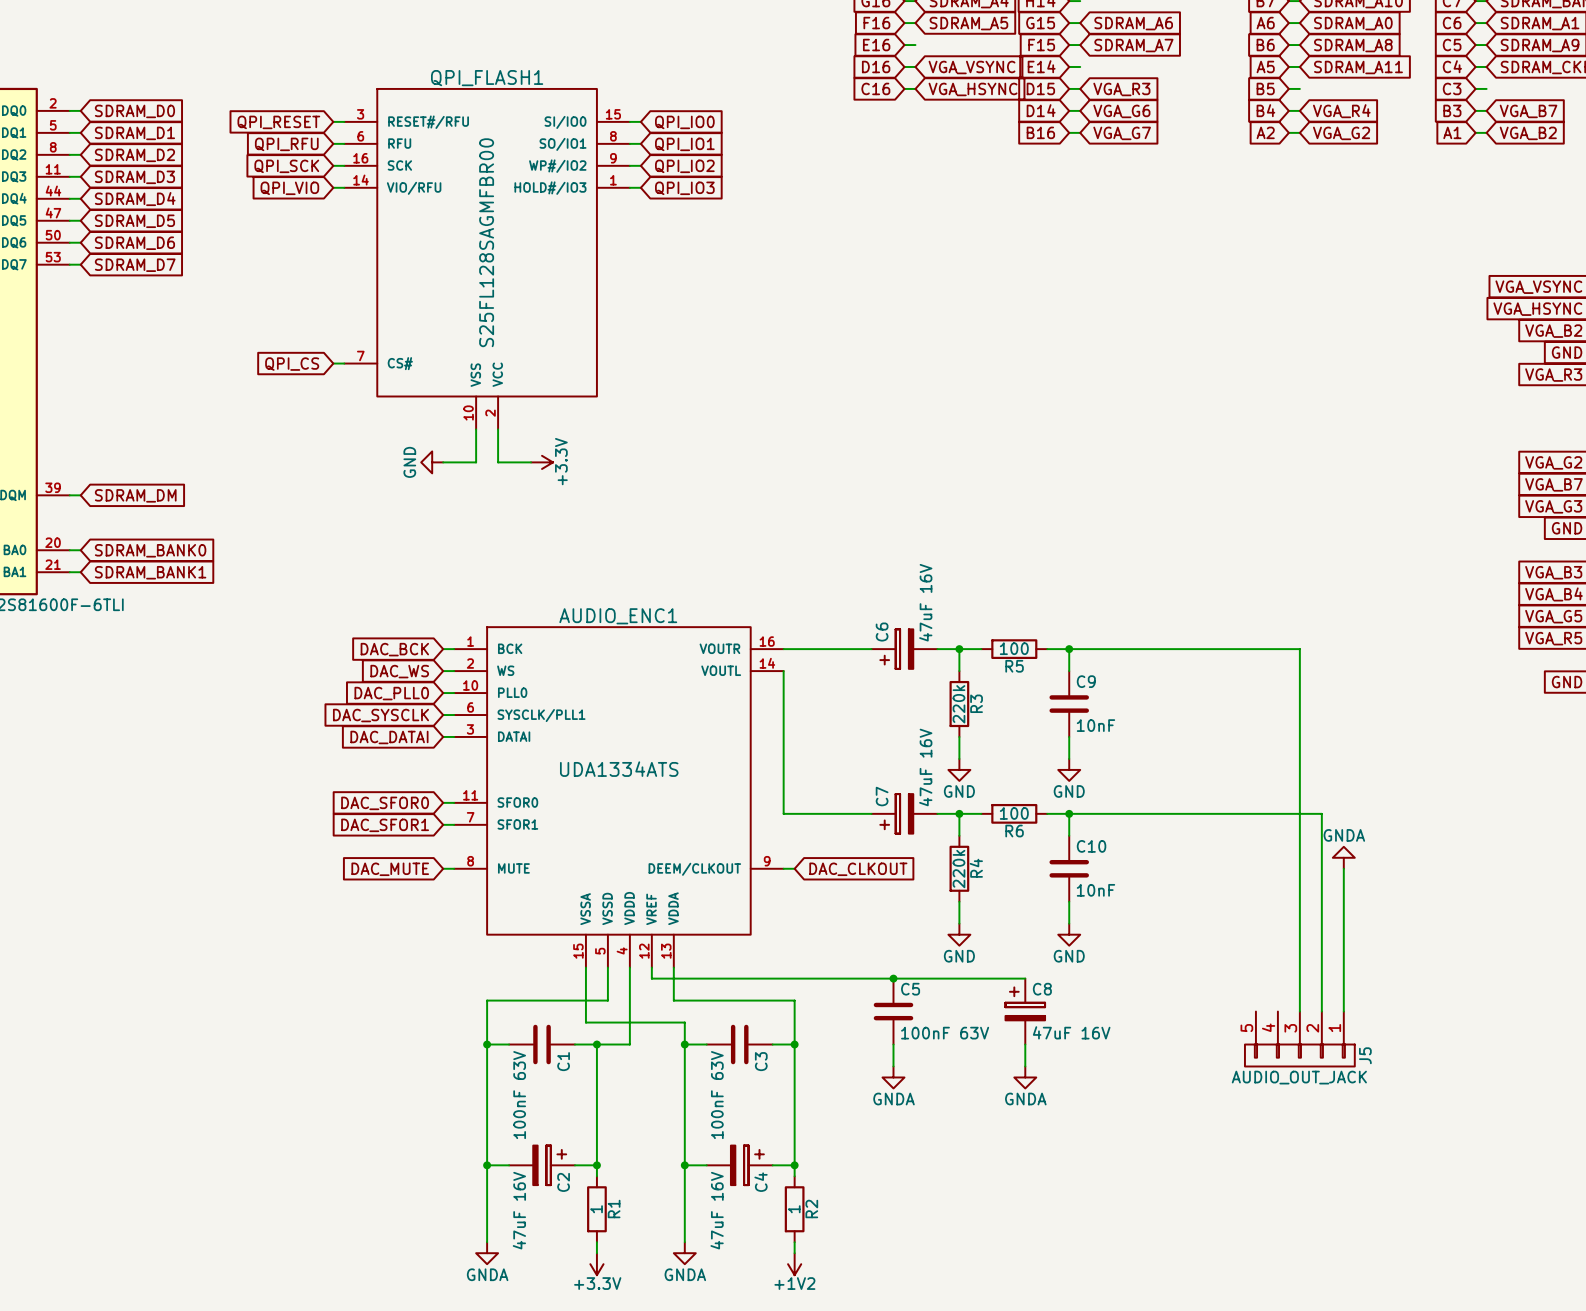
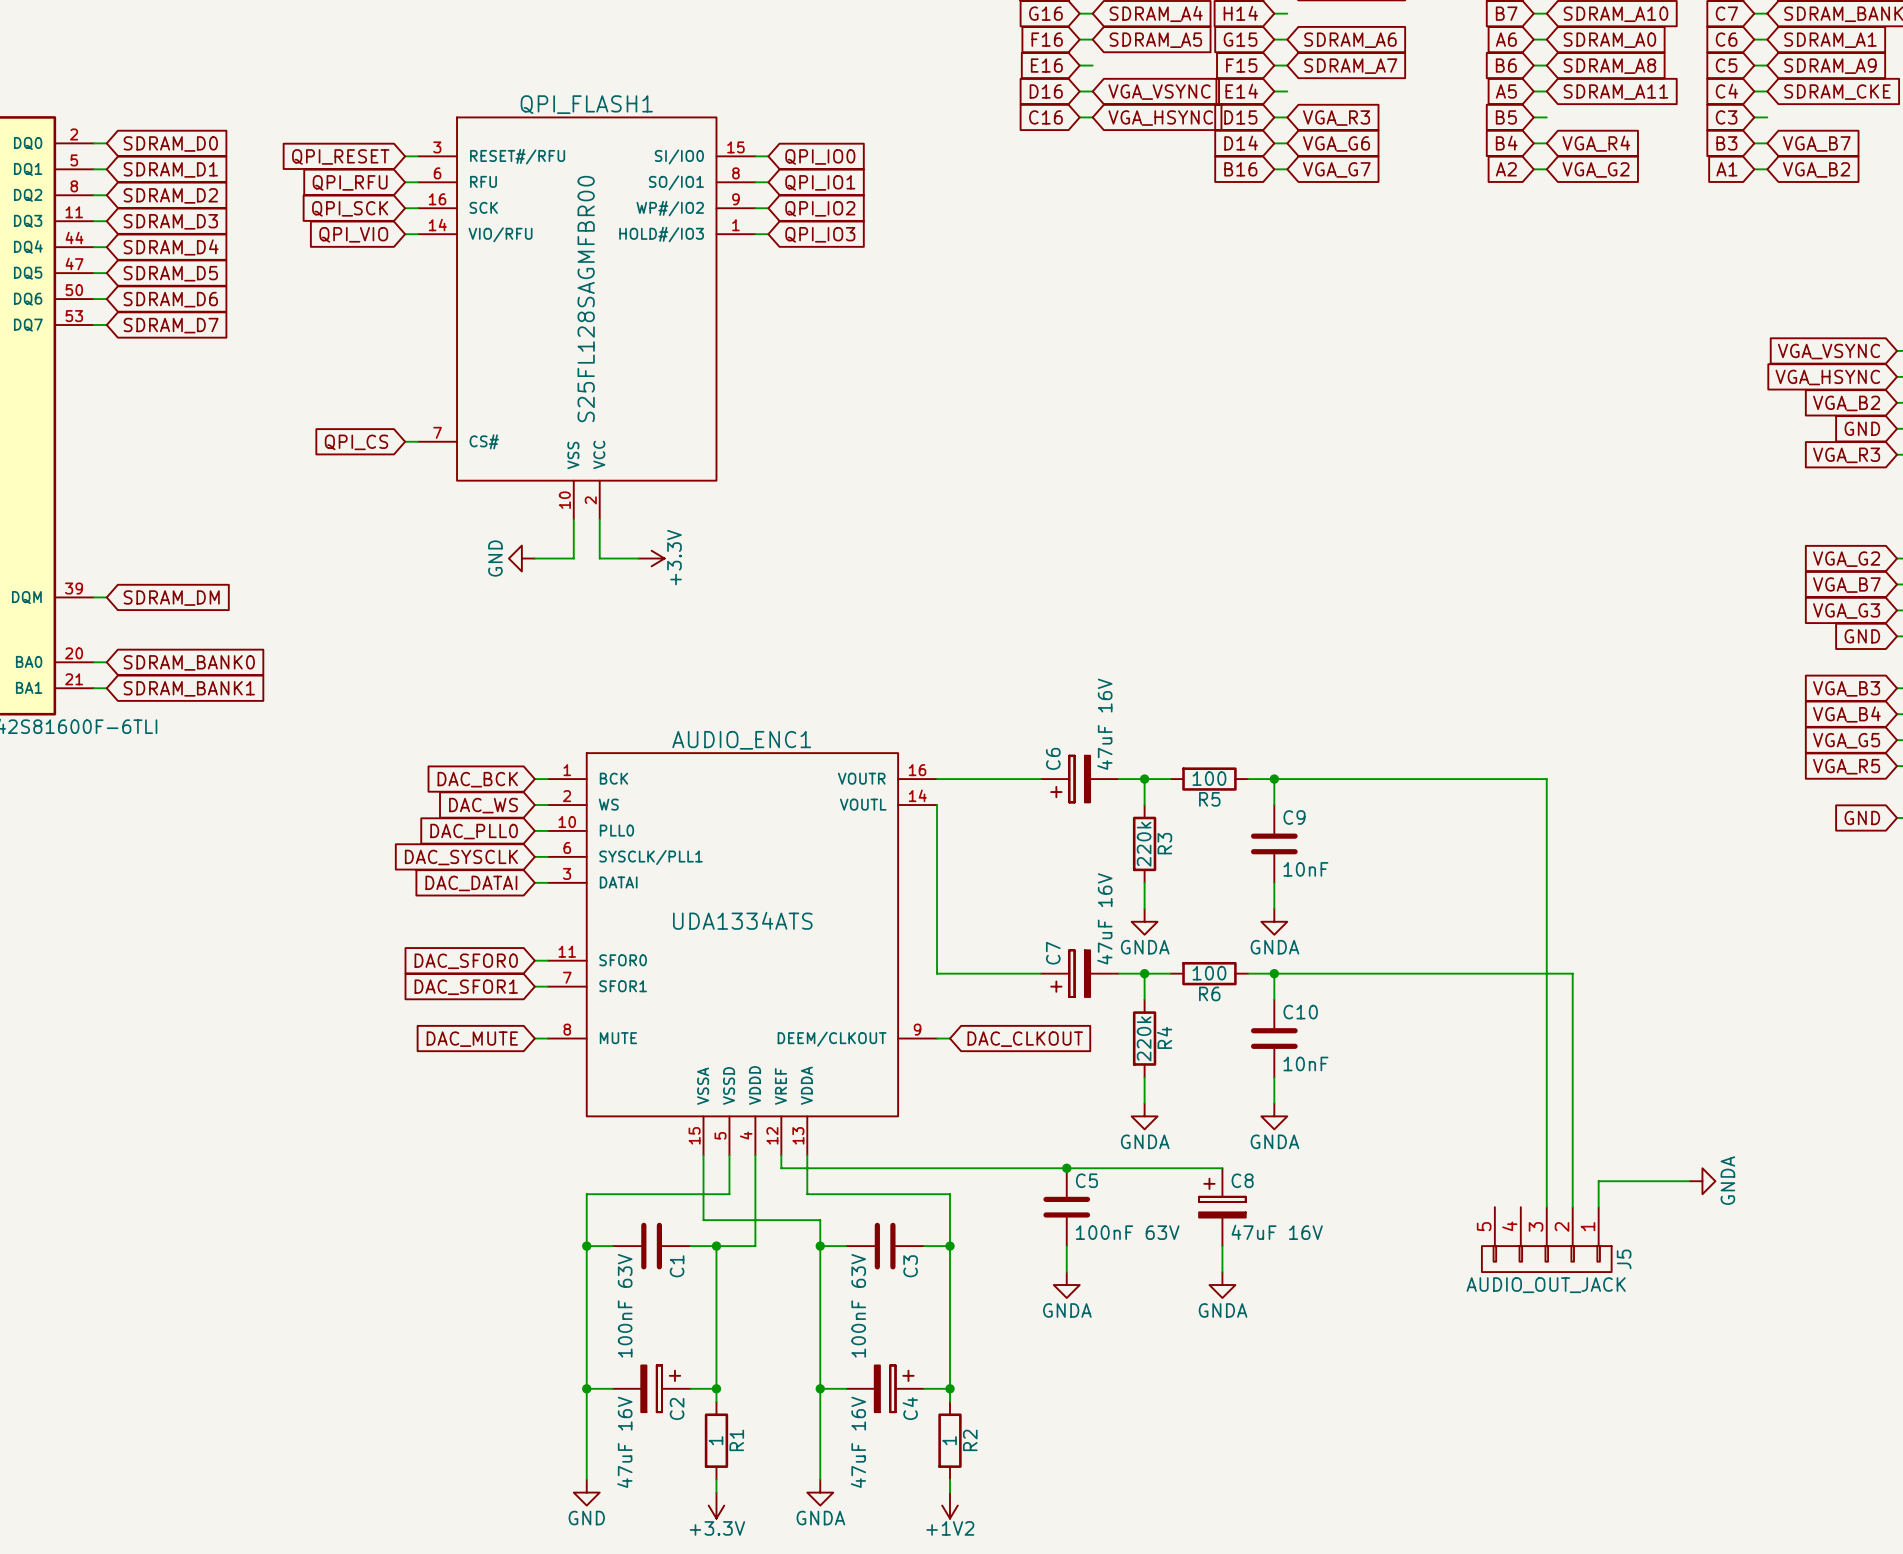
power symbol: GND (959, 769) -> GNDA (1144, 921)
power symbol: GND (1069, 769) -> GNDA (1274, 921)
power symbol rotation: 0° (1343, 857) -> 90° clockwise (1702, 1181)
power symbol position: GNDA (1343, 857) -> GNDA (1702, 1181)
wire: (1343, 868) (1343, 989) -> (1689, 1181) (1598, 1181)
power symbol: GND (959, 934) -> GNDA (1144, 1116)
power symbol: GND (1069, 934) -> GNDA (1274, 1116)
power symbol: GNDA (487, 1253) -> GND (586, 1492)

